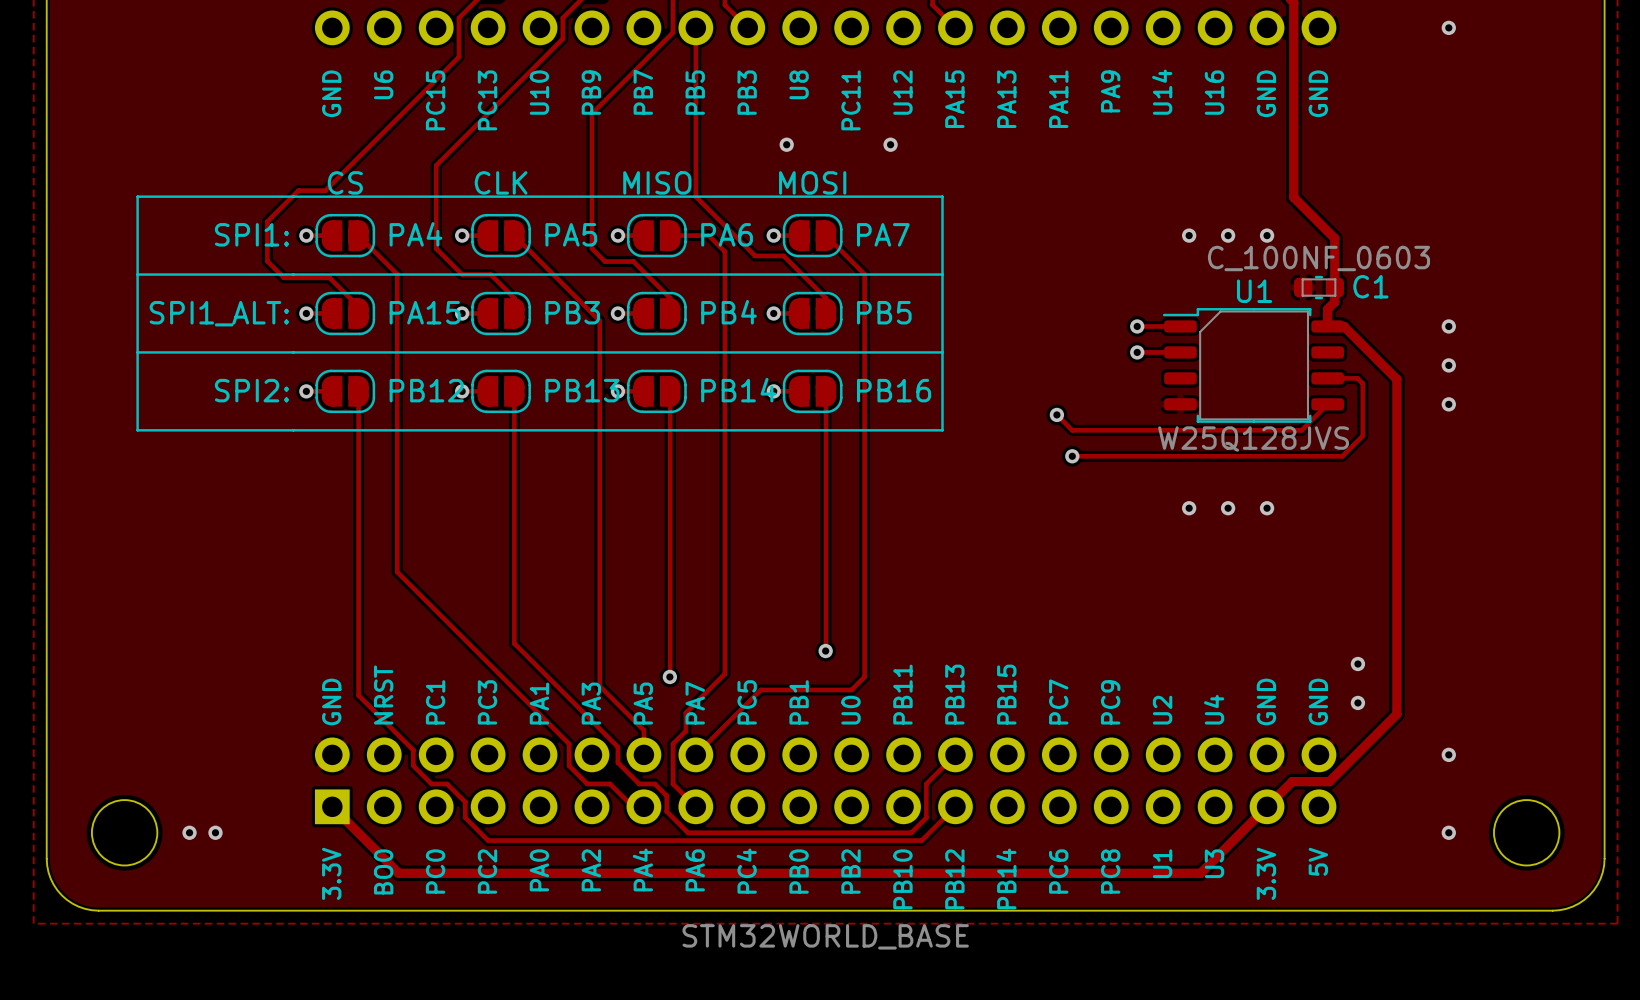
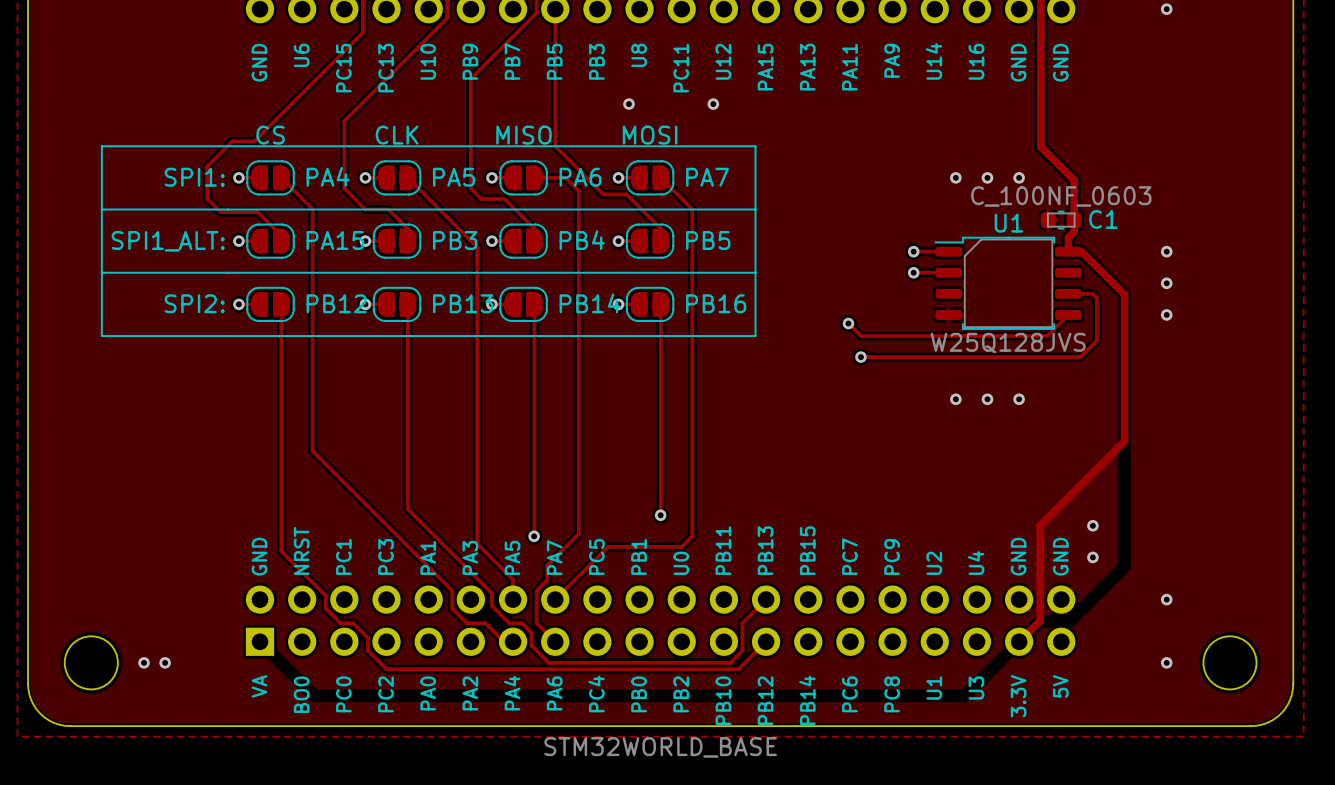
track: (1396, 560) (1396, 714) (1329, 781) (1292, 781) -> (1124, 441) (1040, 525) (1039, 621)
track: (332, 806) (398, 873) (1200, 873) (1267, 806) -> none
part text: 3.3V (331, 873) -> VA (259, 686)

